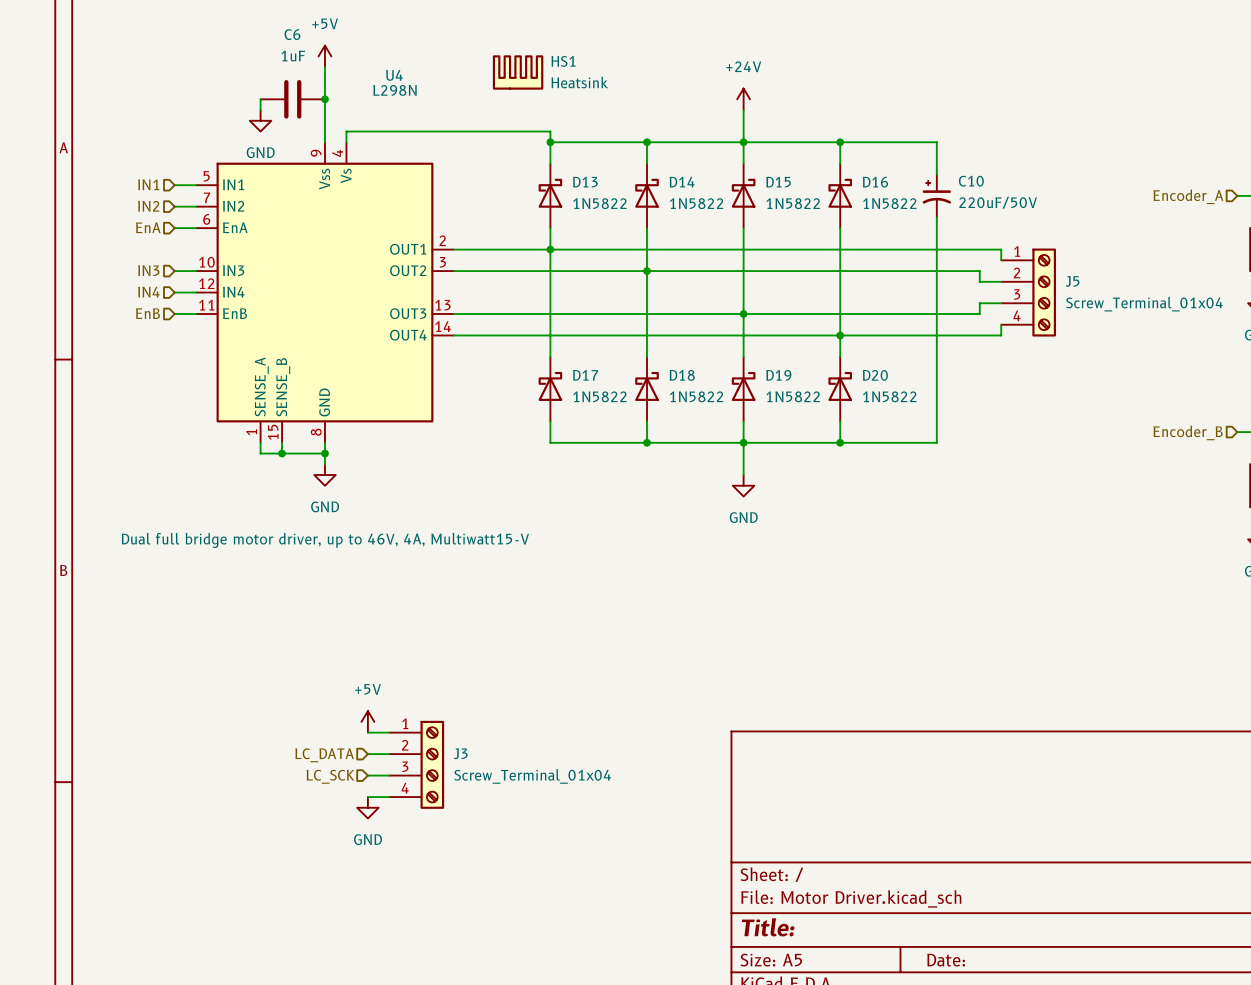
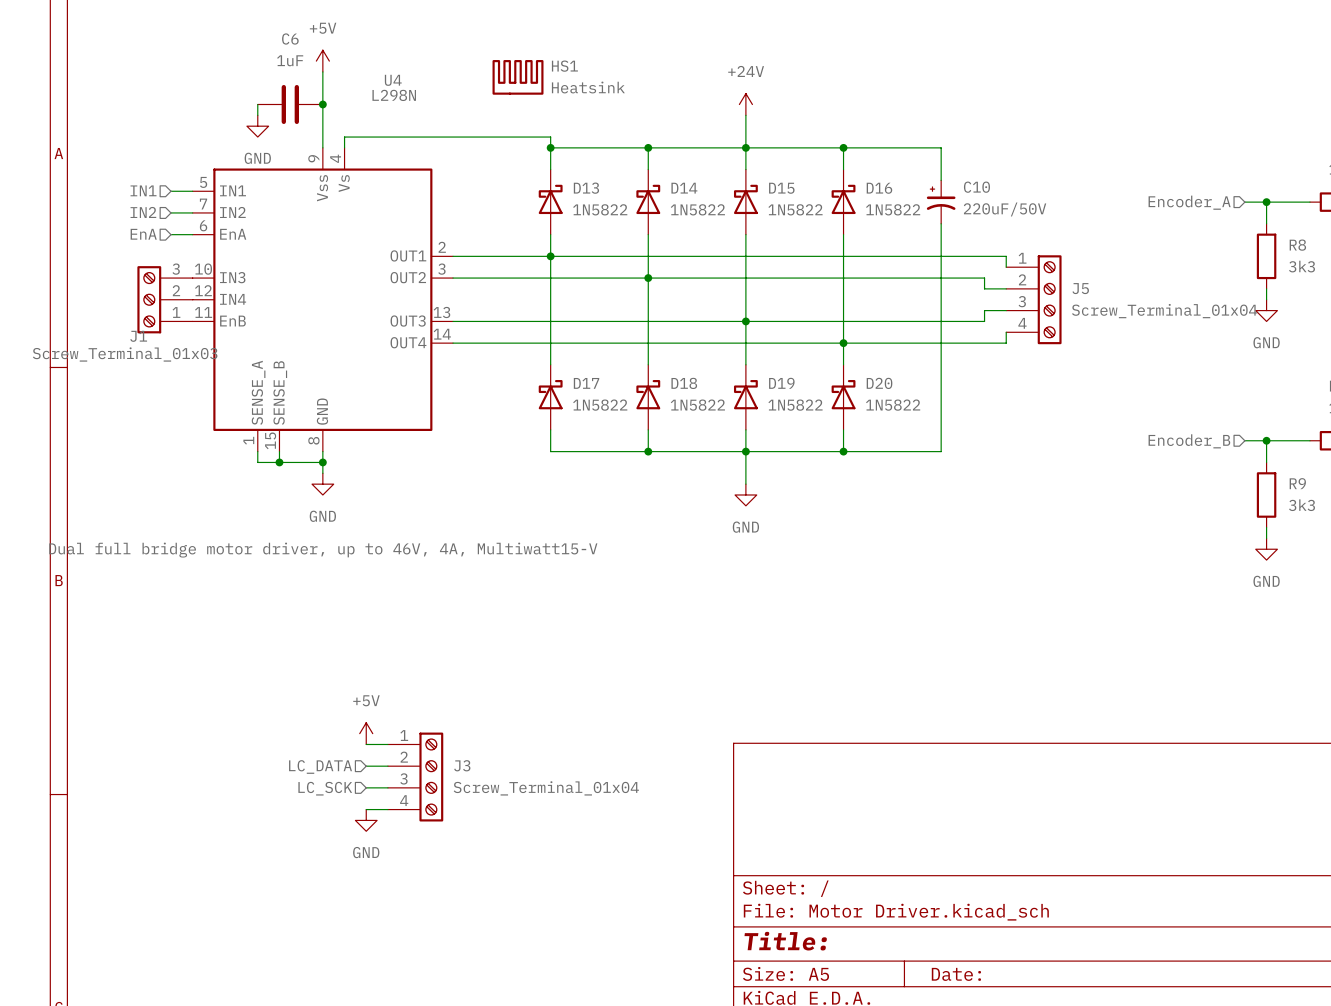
hierarchical label: IN3 (148, 270) -> none
hierarchical label: IN4 (148, 292) -> none
J1: none -> Screw_Terminal_01x03 (165, 299)
hierarchical label: EnB (148, 313) -> none

